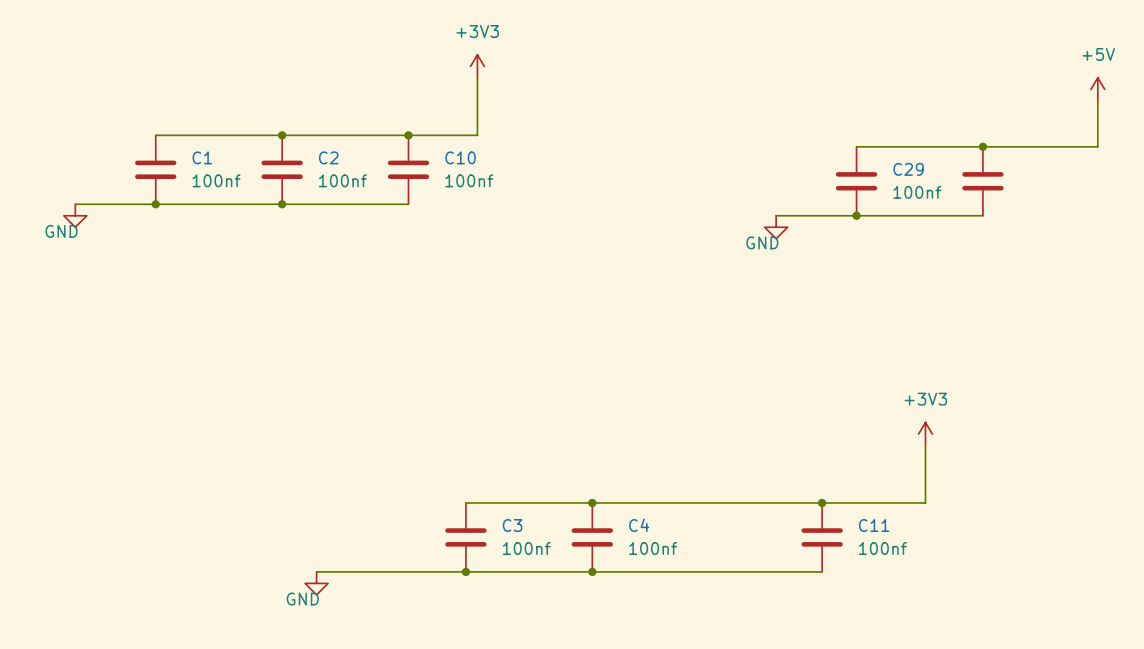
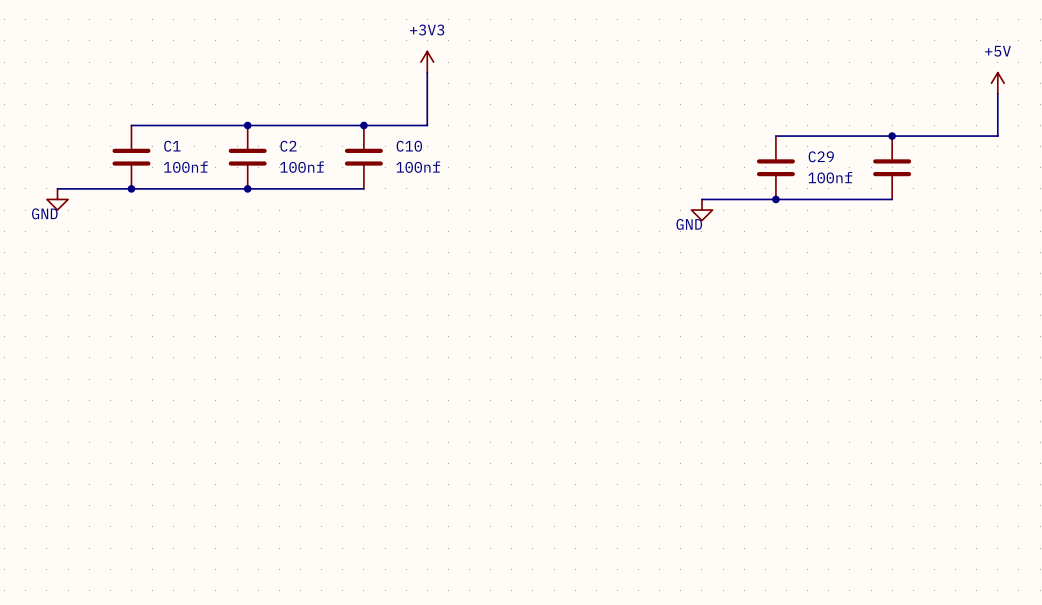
power symbol: +3V3 (925, 434) -> none
wire: (925, 445) (925, 502) (465, 502) -> none
junction: (592, 502) -> none
junction: (822, 502) -> none
C3: 100nf (465, 537) -> none
C4: 100nf (592, 537) -> none
C11: 100nf (822, 537) -> none
wire: (316, 571) (822, 571) -> none
junction: (465, 571) -> none
junction: (592, 571) -> none
power symbol: GND (316, 583) -> none

